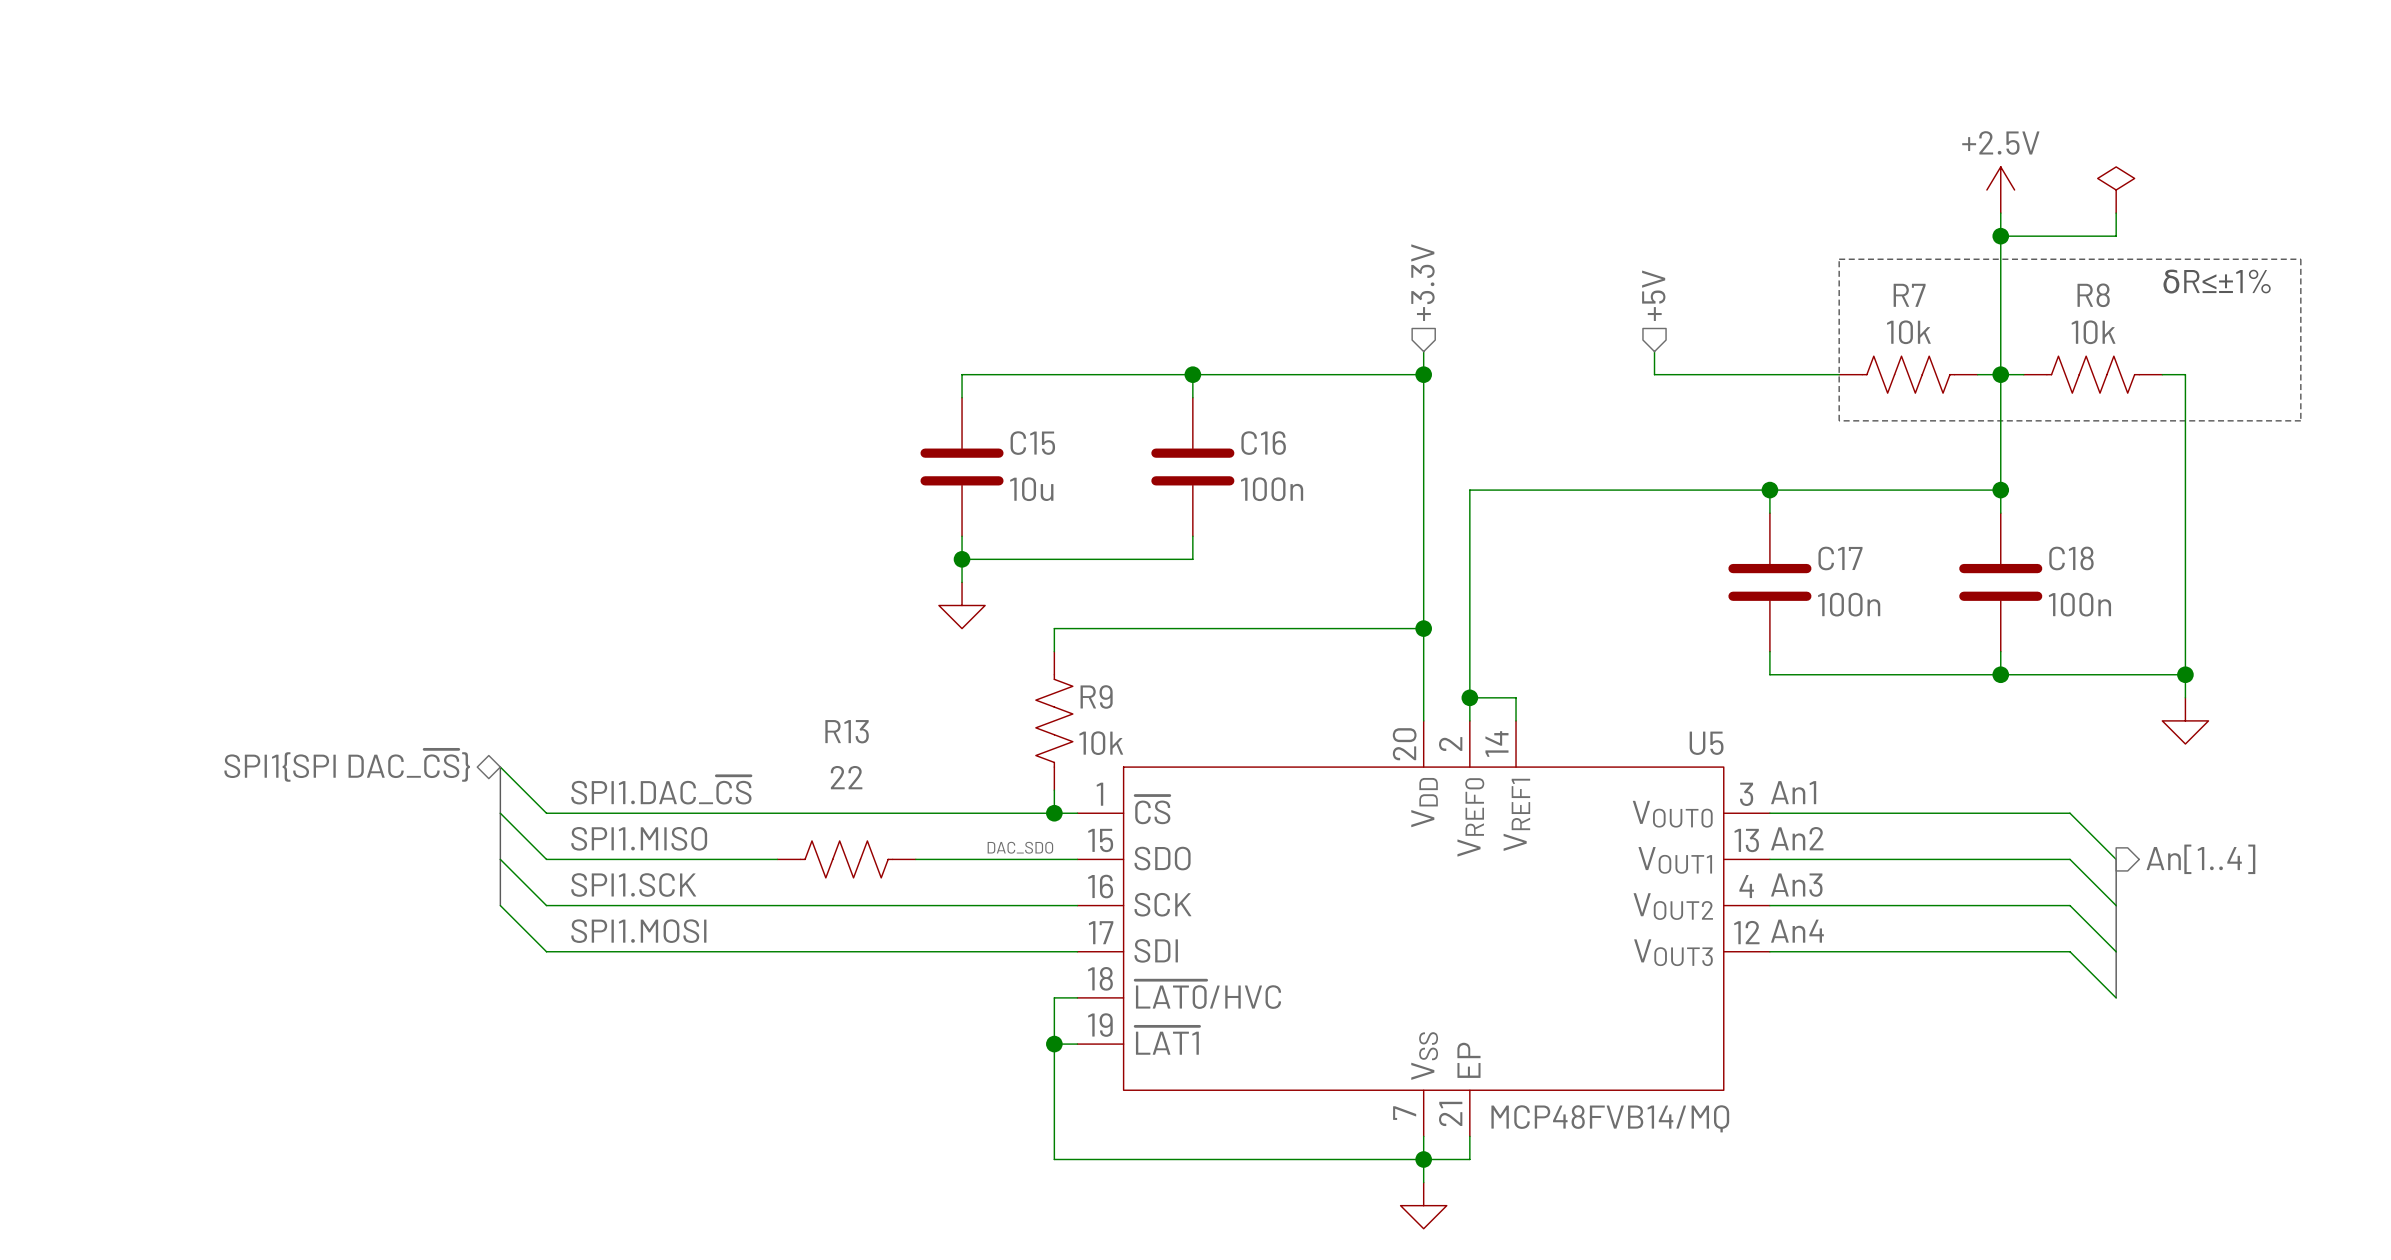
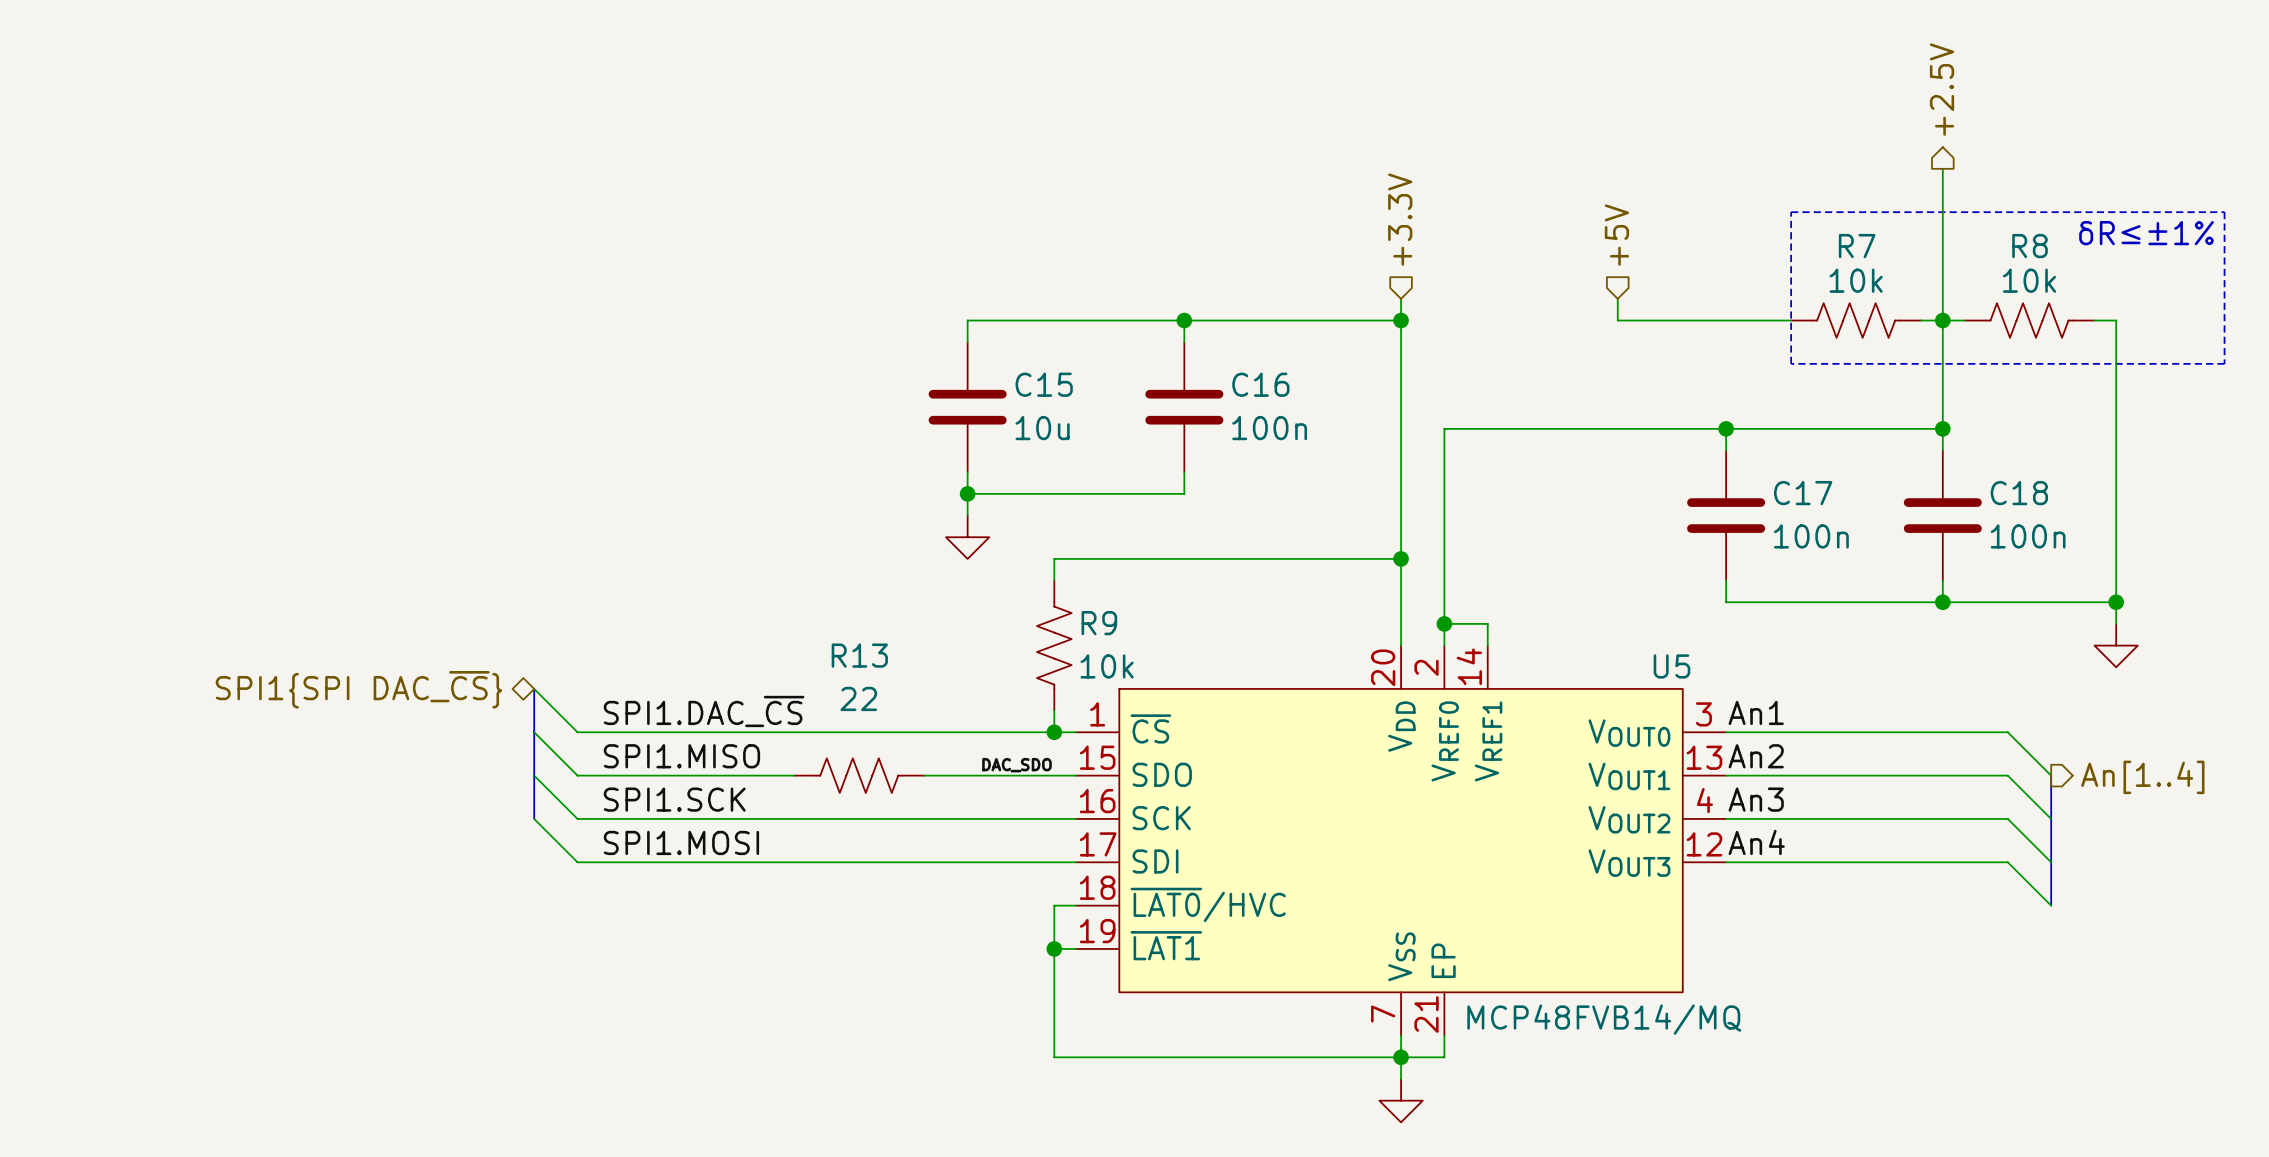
hierarchical label: none -> +2.5V (1942, 89)
power symbol: +2.5V (2000, 190) -> none
power symbol: (2116, 190) -> none
wire: (2116, 213) (2116, 236) (2000, 236) -> none
junction: (2000, 236) -> none

